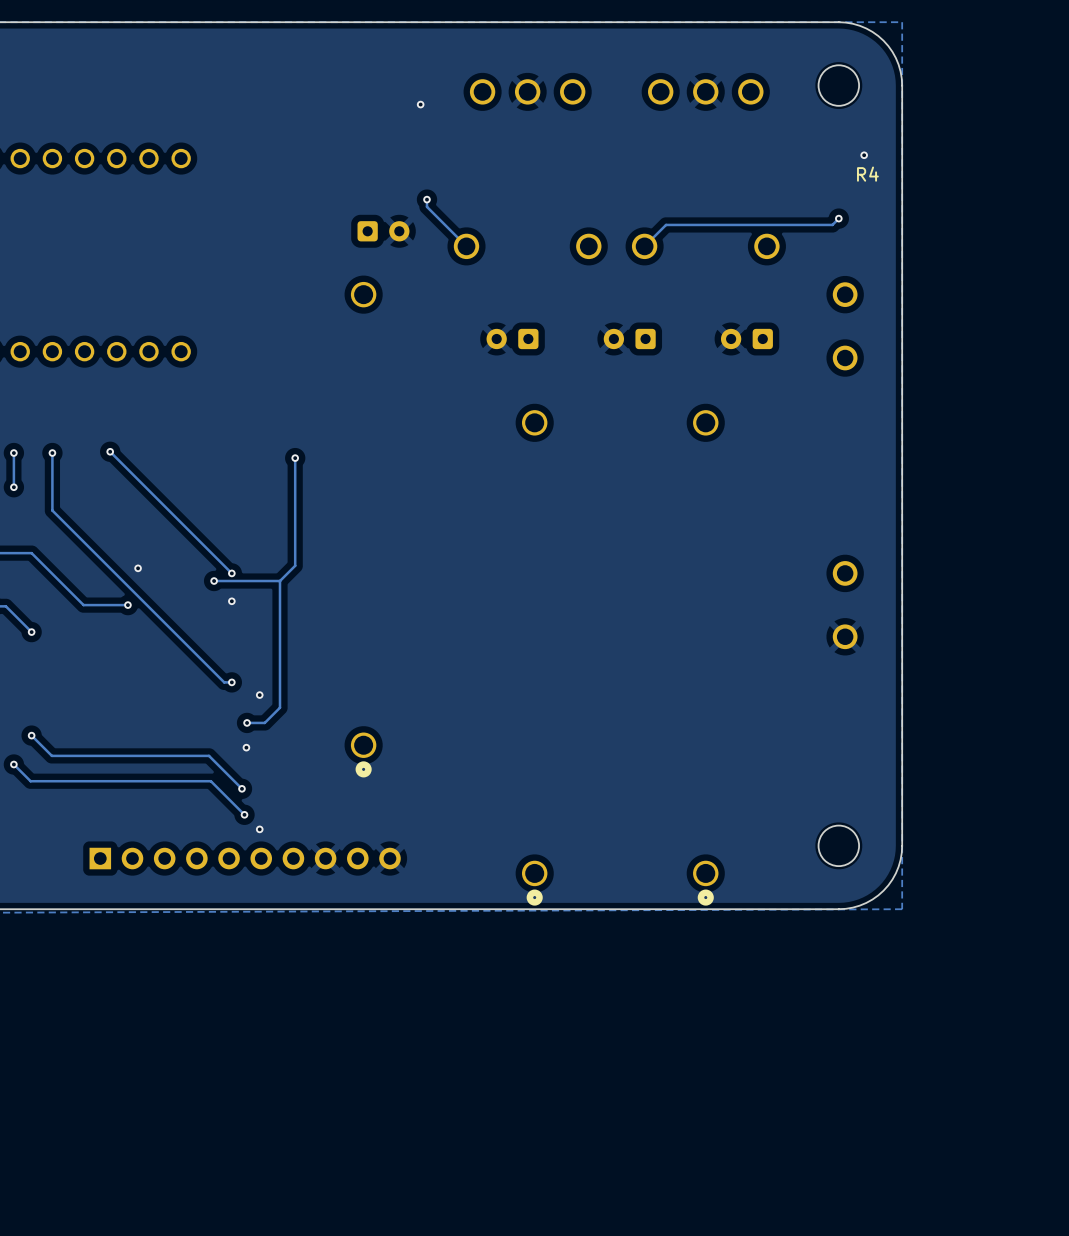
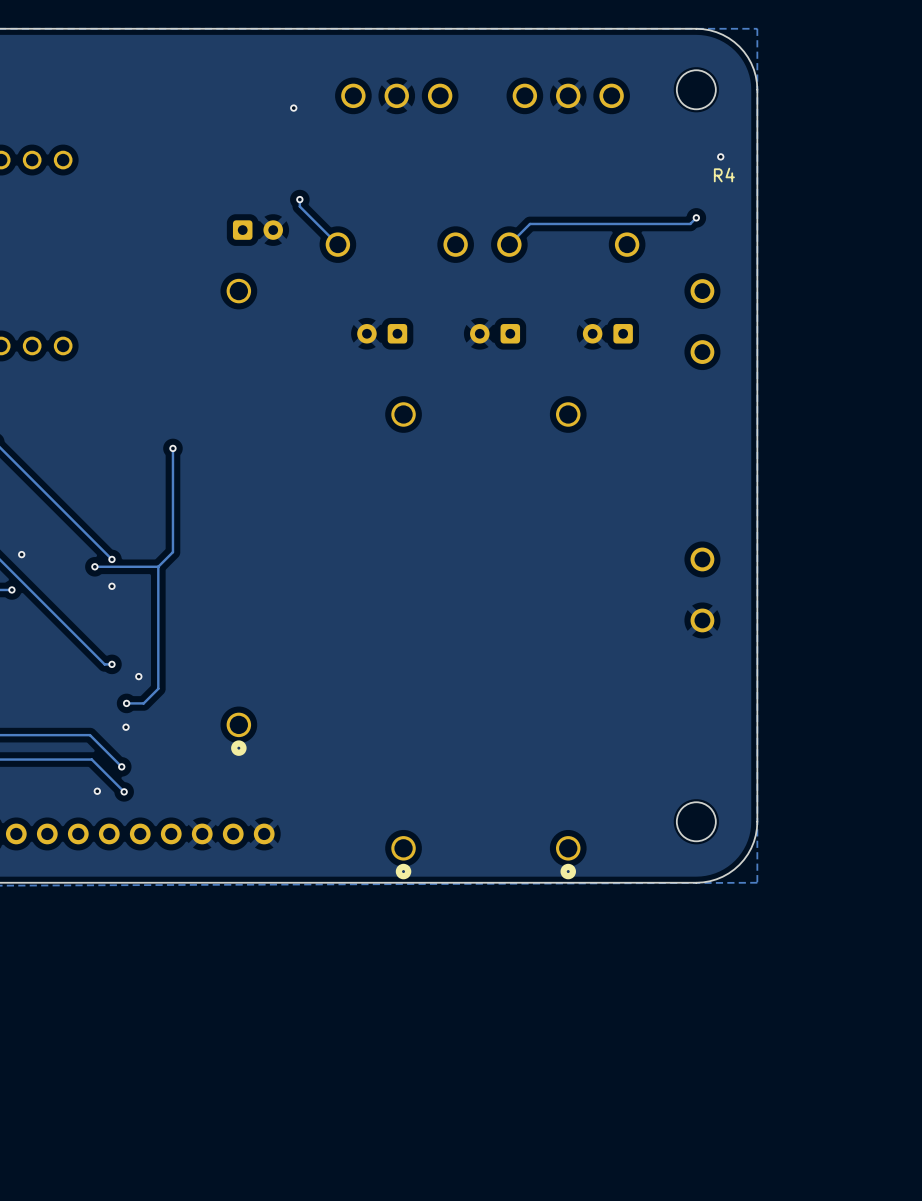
via position: (259, 829) -> (97, 791)

